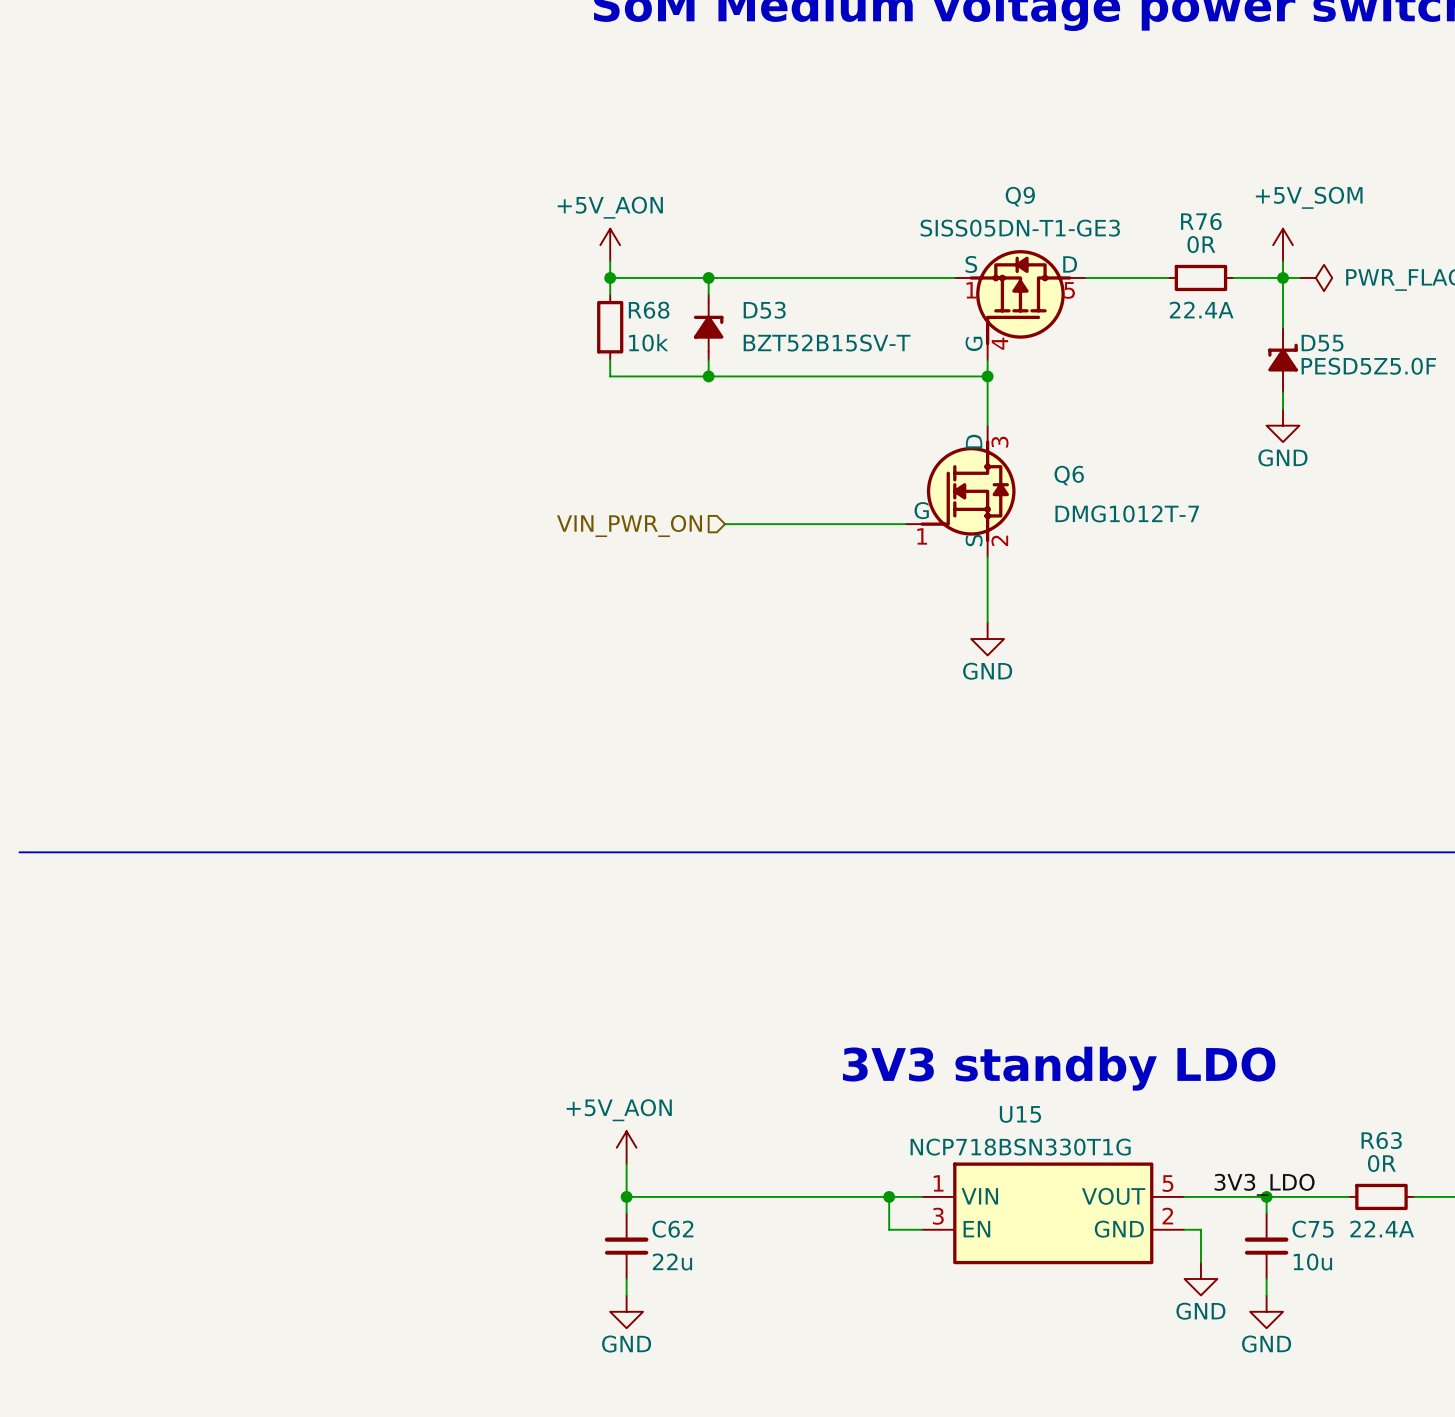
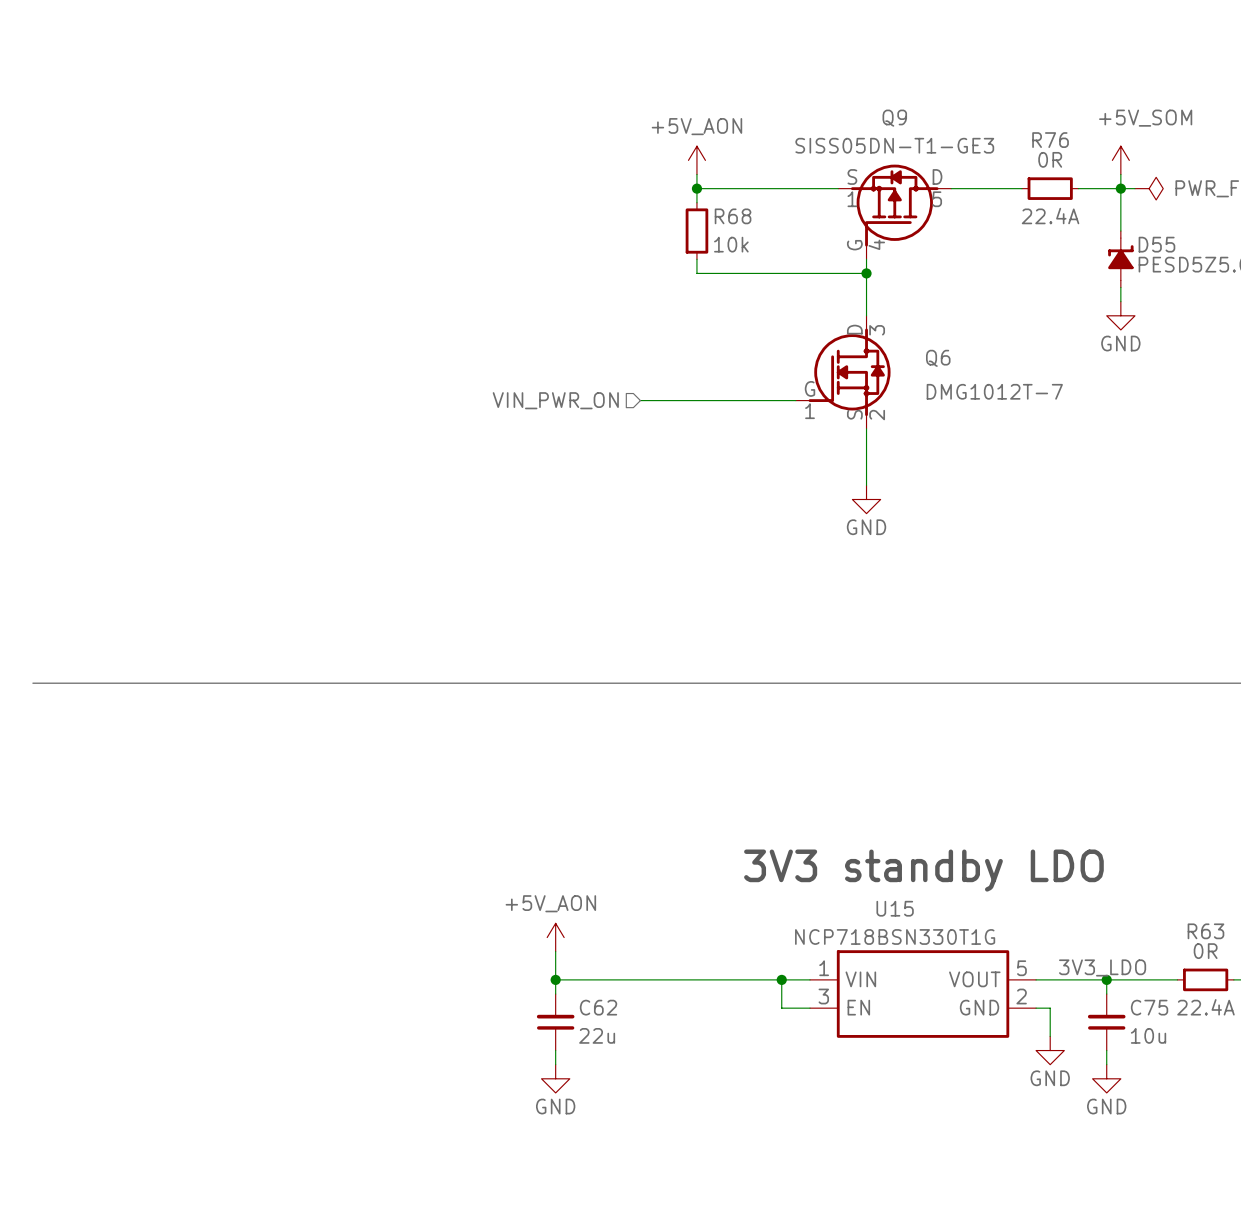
power symbol position: +5V_AON (610, 245) -> +5V_AON (696, 160)
wire: (610, 261) (610, 294) -> (696, 174) (696, 202)
wire: (610, 277) (790, 277) -> none
junction: (610, 277) -> none
wire: (708, 277) (708, 294) -> none
junction: (708, 277) -> none
junction: none -> (696, 188)
R68 position: (610, 327) -> (696, 231)
D53: (708, 327) -> none
wire: (610, 360) (610, 376) (790, 376) -> (696, 259) (696, 273)
wire: (708, 360) (708, 376) -> none
junction: (708, 376) -> none

